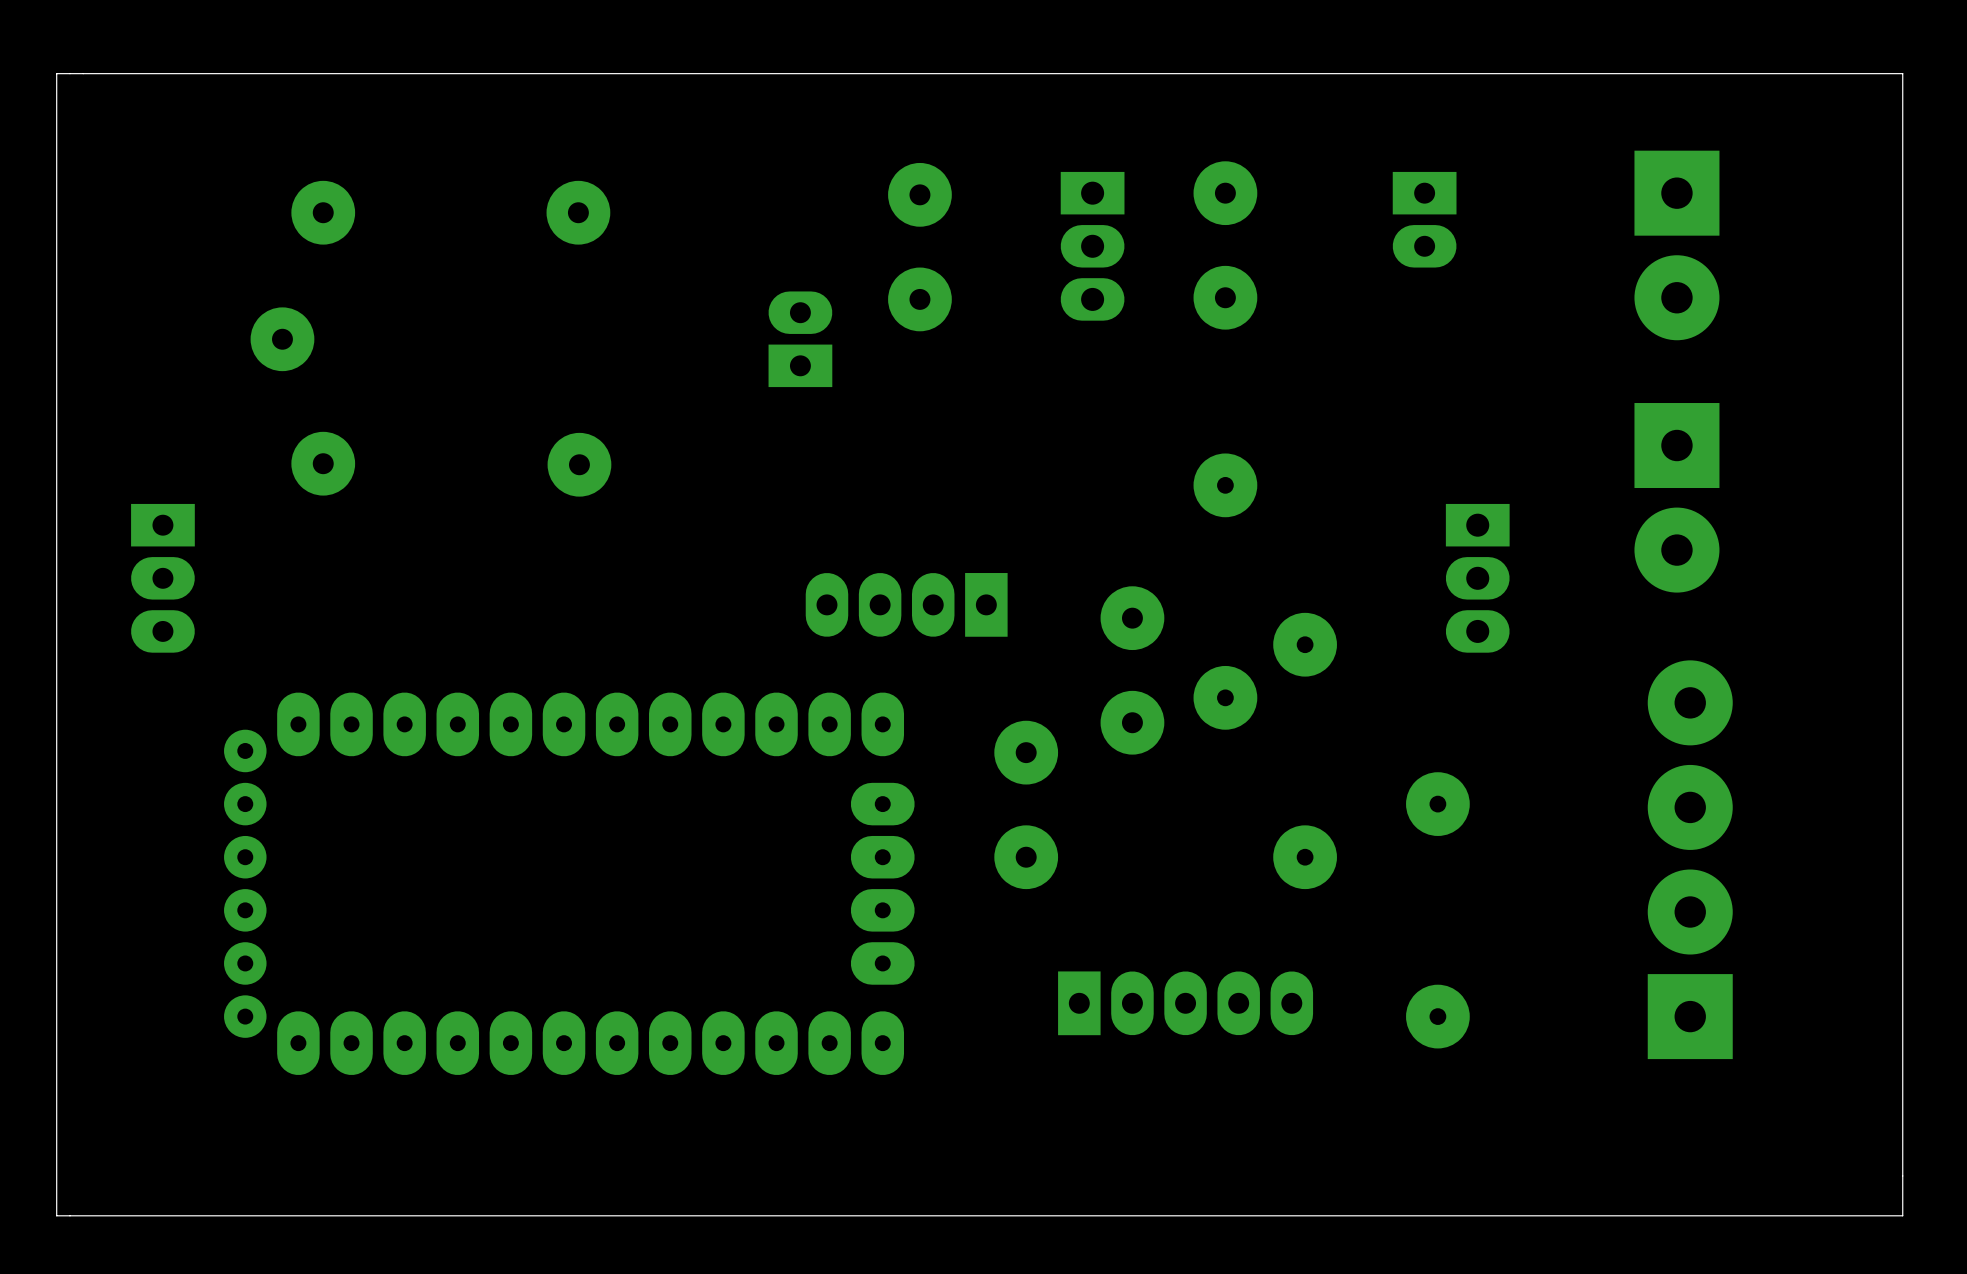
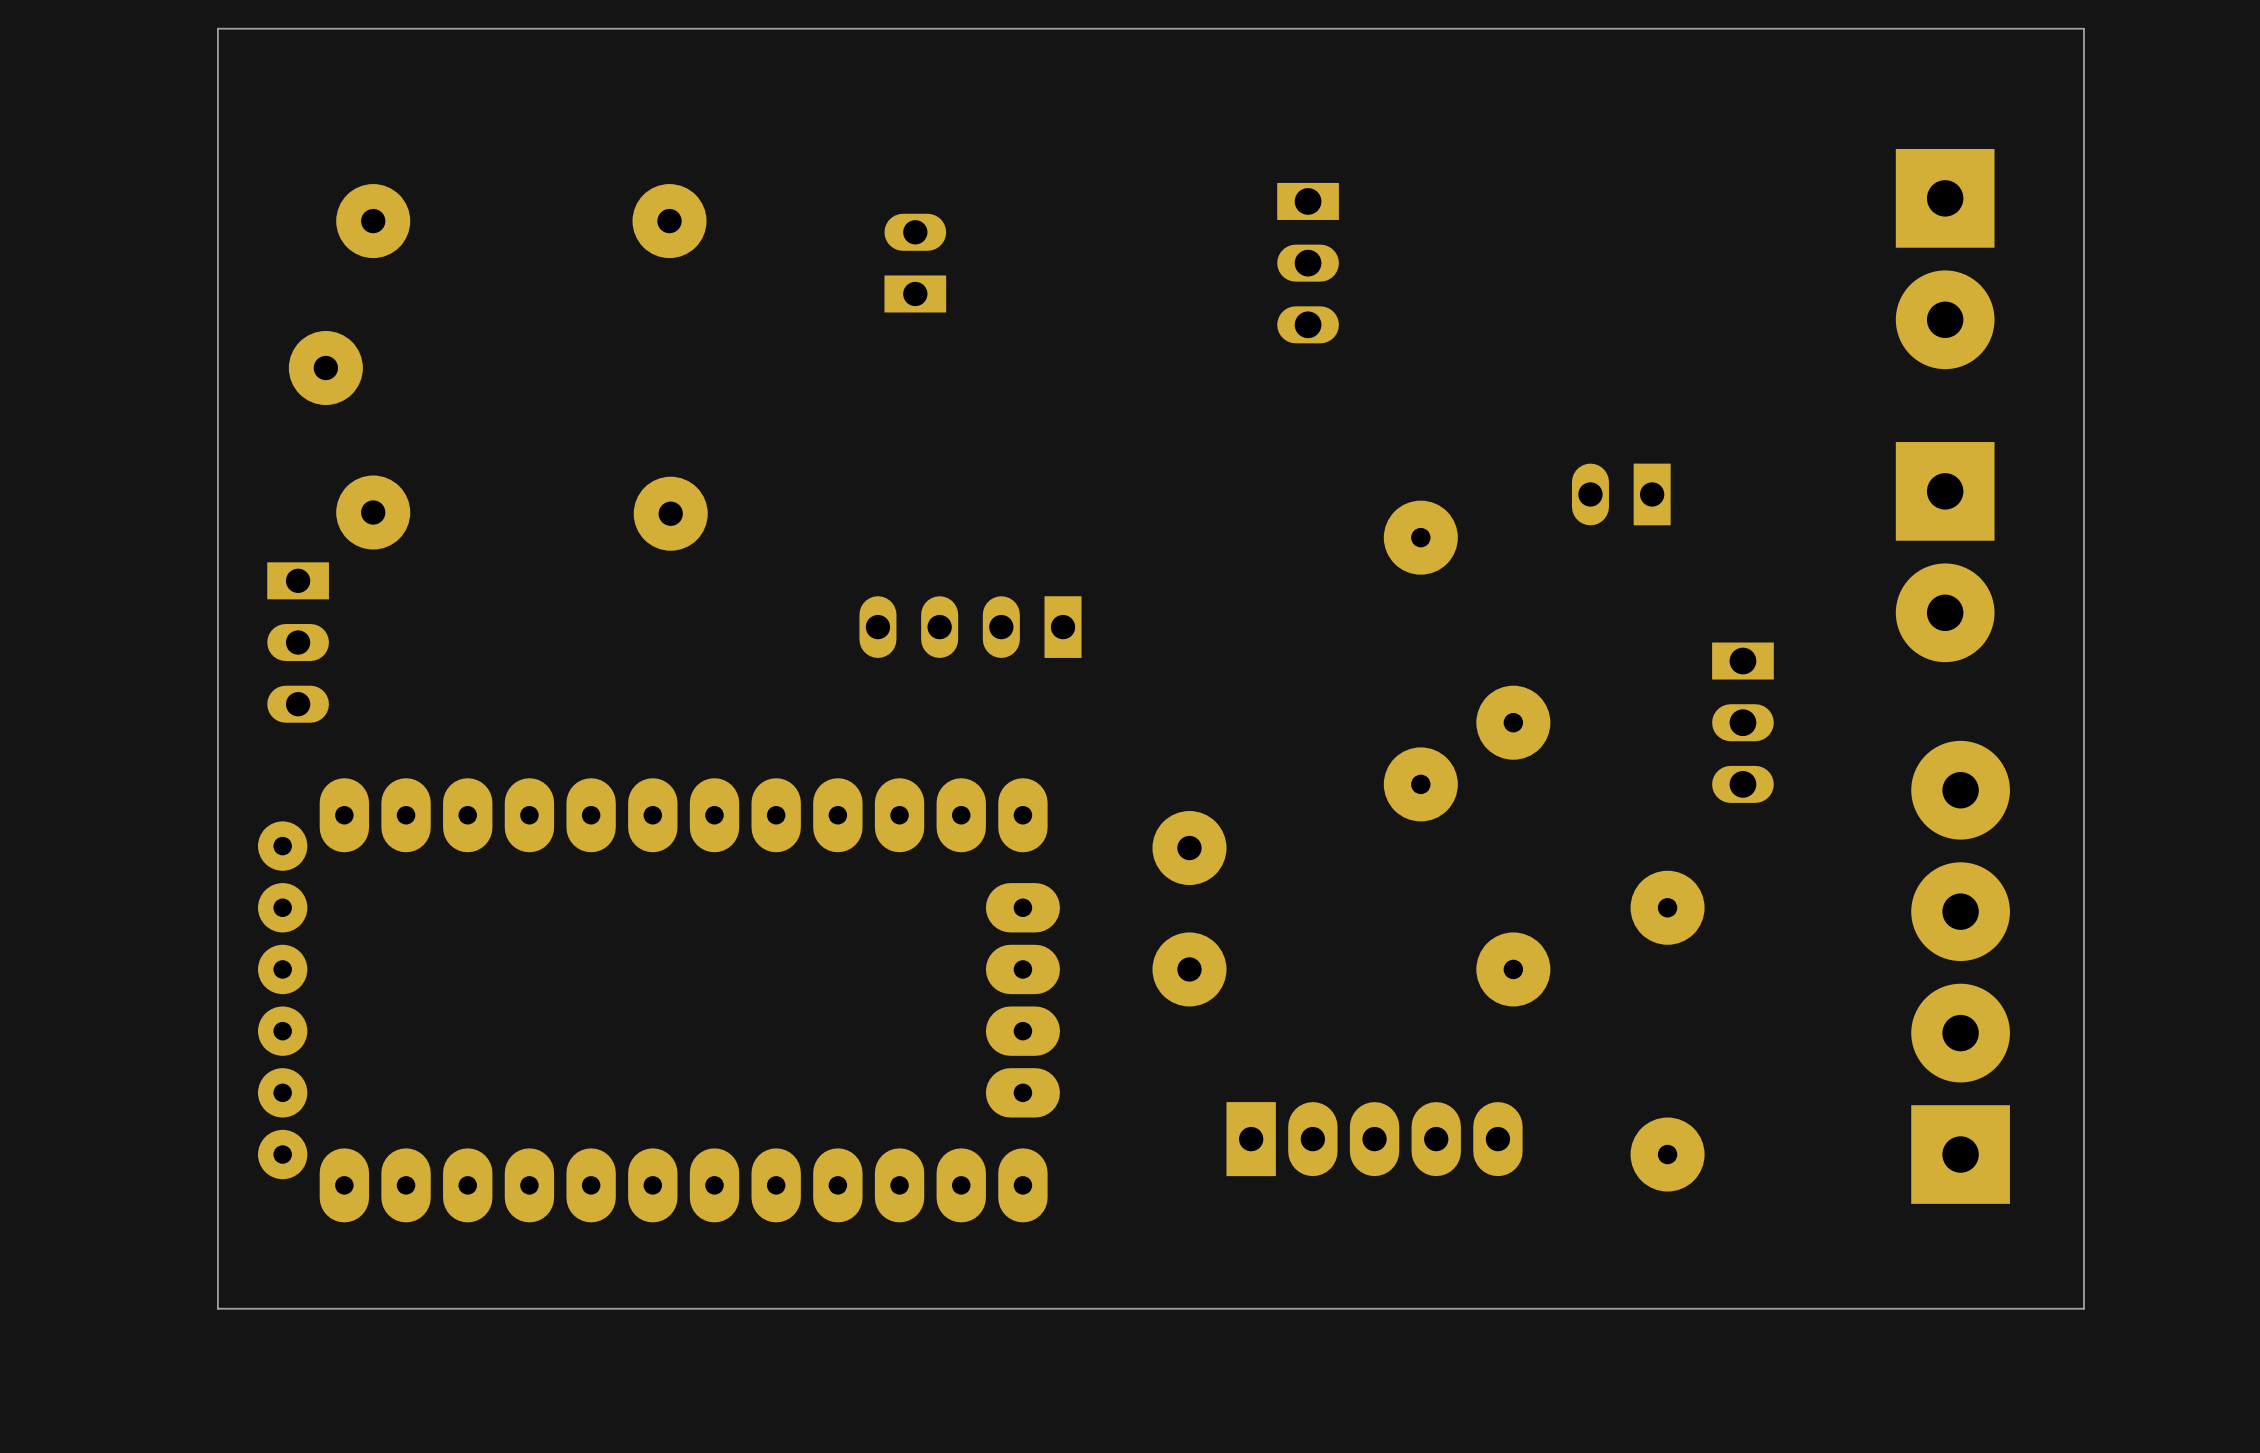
board edge: (1902, 73) (1902, 1215) (56, 1215) (56, 73) (1902, 73) -> (2083, 28) (2083, 1308) (217, 1308) (217, 28) (2083, 28)
part: (1424, 219) -> none
part: (1225, 245) -> none
part: (1092, 246) -> none
part: (919, 247) -> none
part: none -> (915, 263)
part: none -> (1308, 263)
part: (800, 339) -> none
part: none -> (1621, 494)
part: none -> (970, 627)
part: none -> (298, 642)
part: (162, 578) -> none
part: (1477, 578) -> none
part: (906, 604) -> none
part: none -> (1742, 722)
part: (1132, 670) -> none

